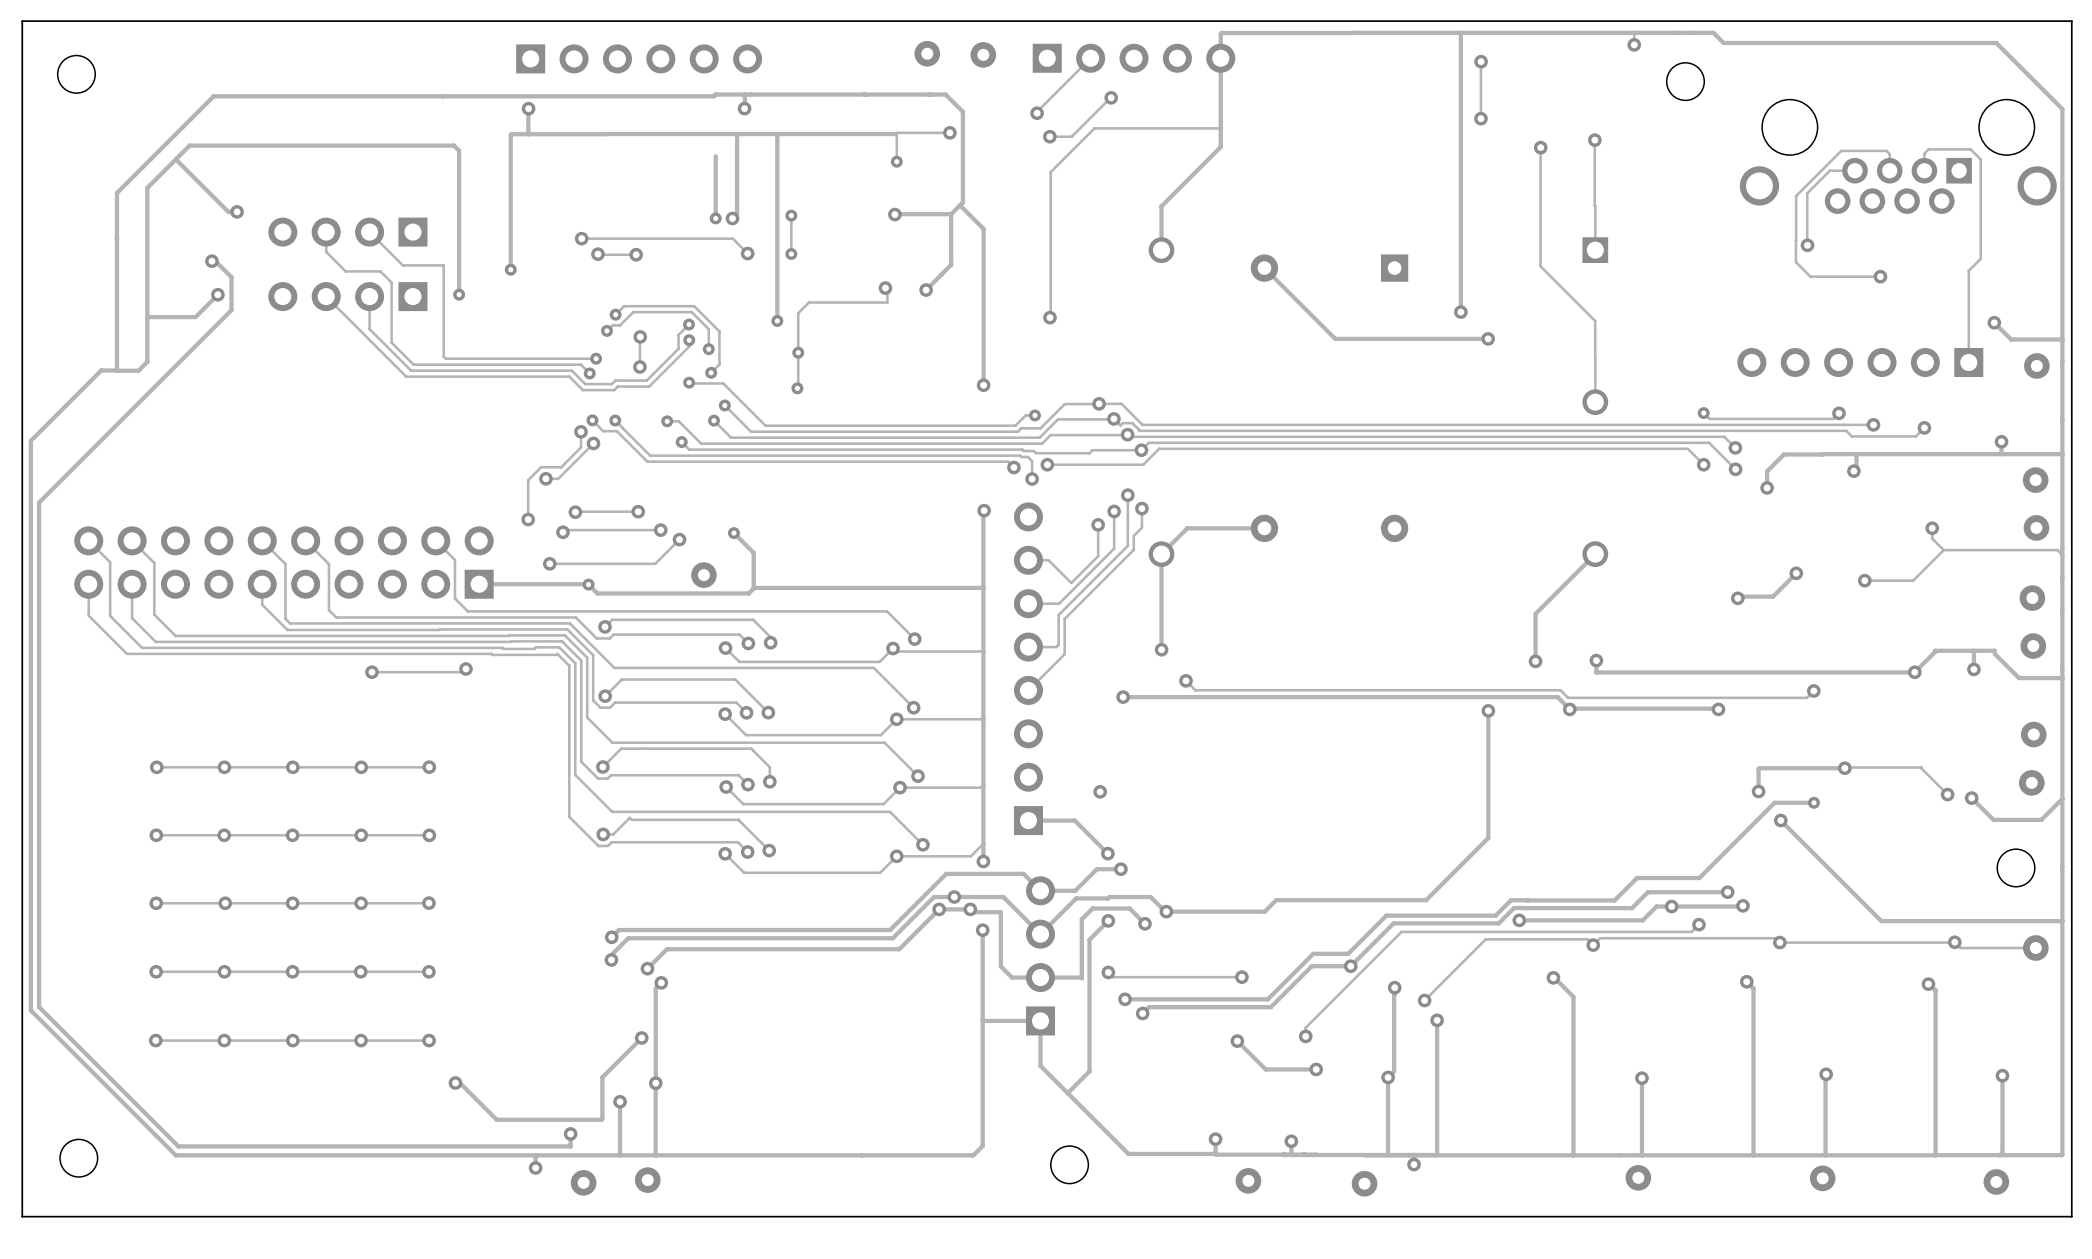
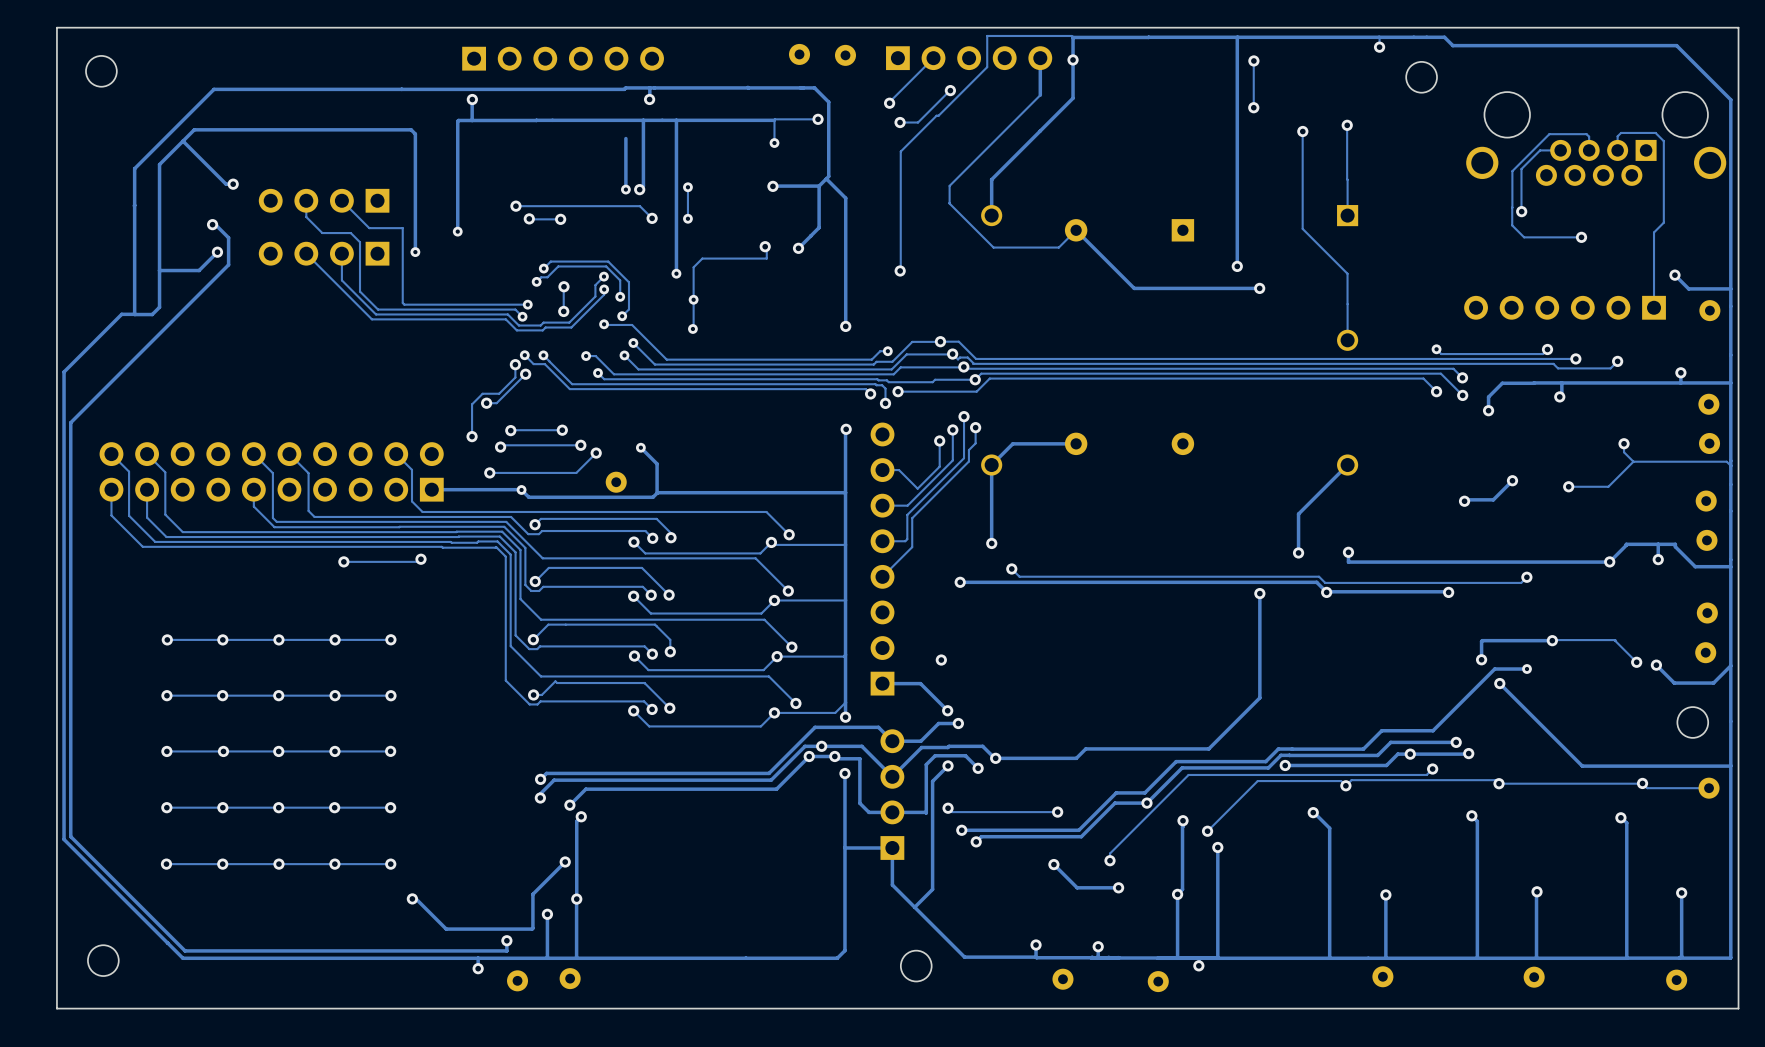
track: (1260, 33) (1221, 33) (1220, 58) -> none
via: none -> (1073, 59)
track: (1220, 103) (1220, 147) -> (1040, 95) (949, 185) (949, 203) (993, 247) (1058, 247) (1076, 230)
track: (1220, 128) (1096, 128) -> (1040, 130) (1073, 98) (1071, 35) (987, 35) (987, 67) (938, 115)

